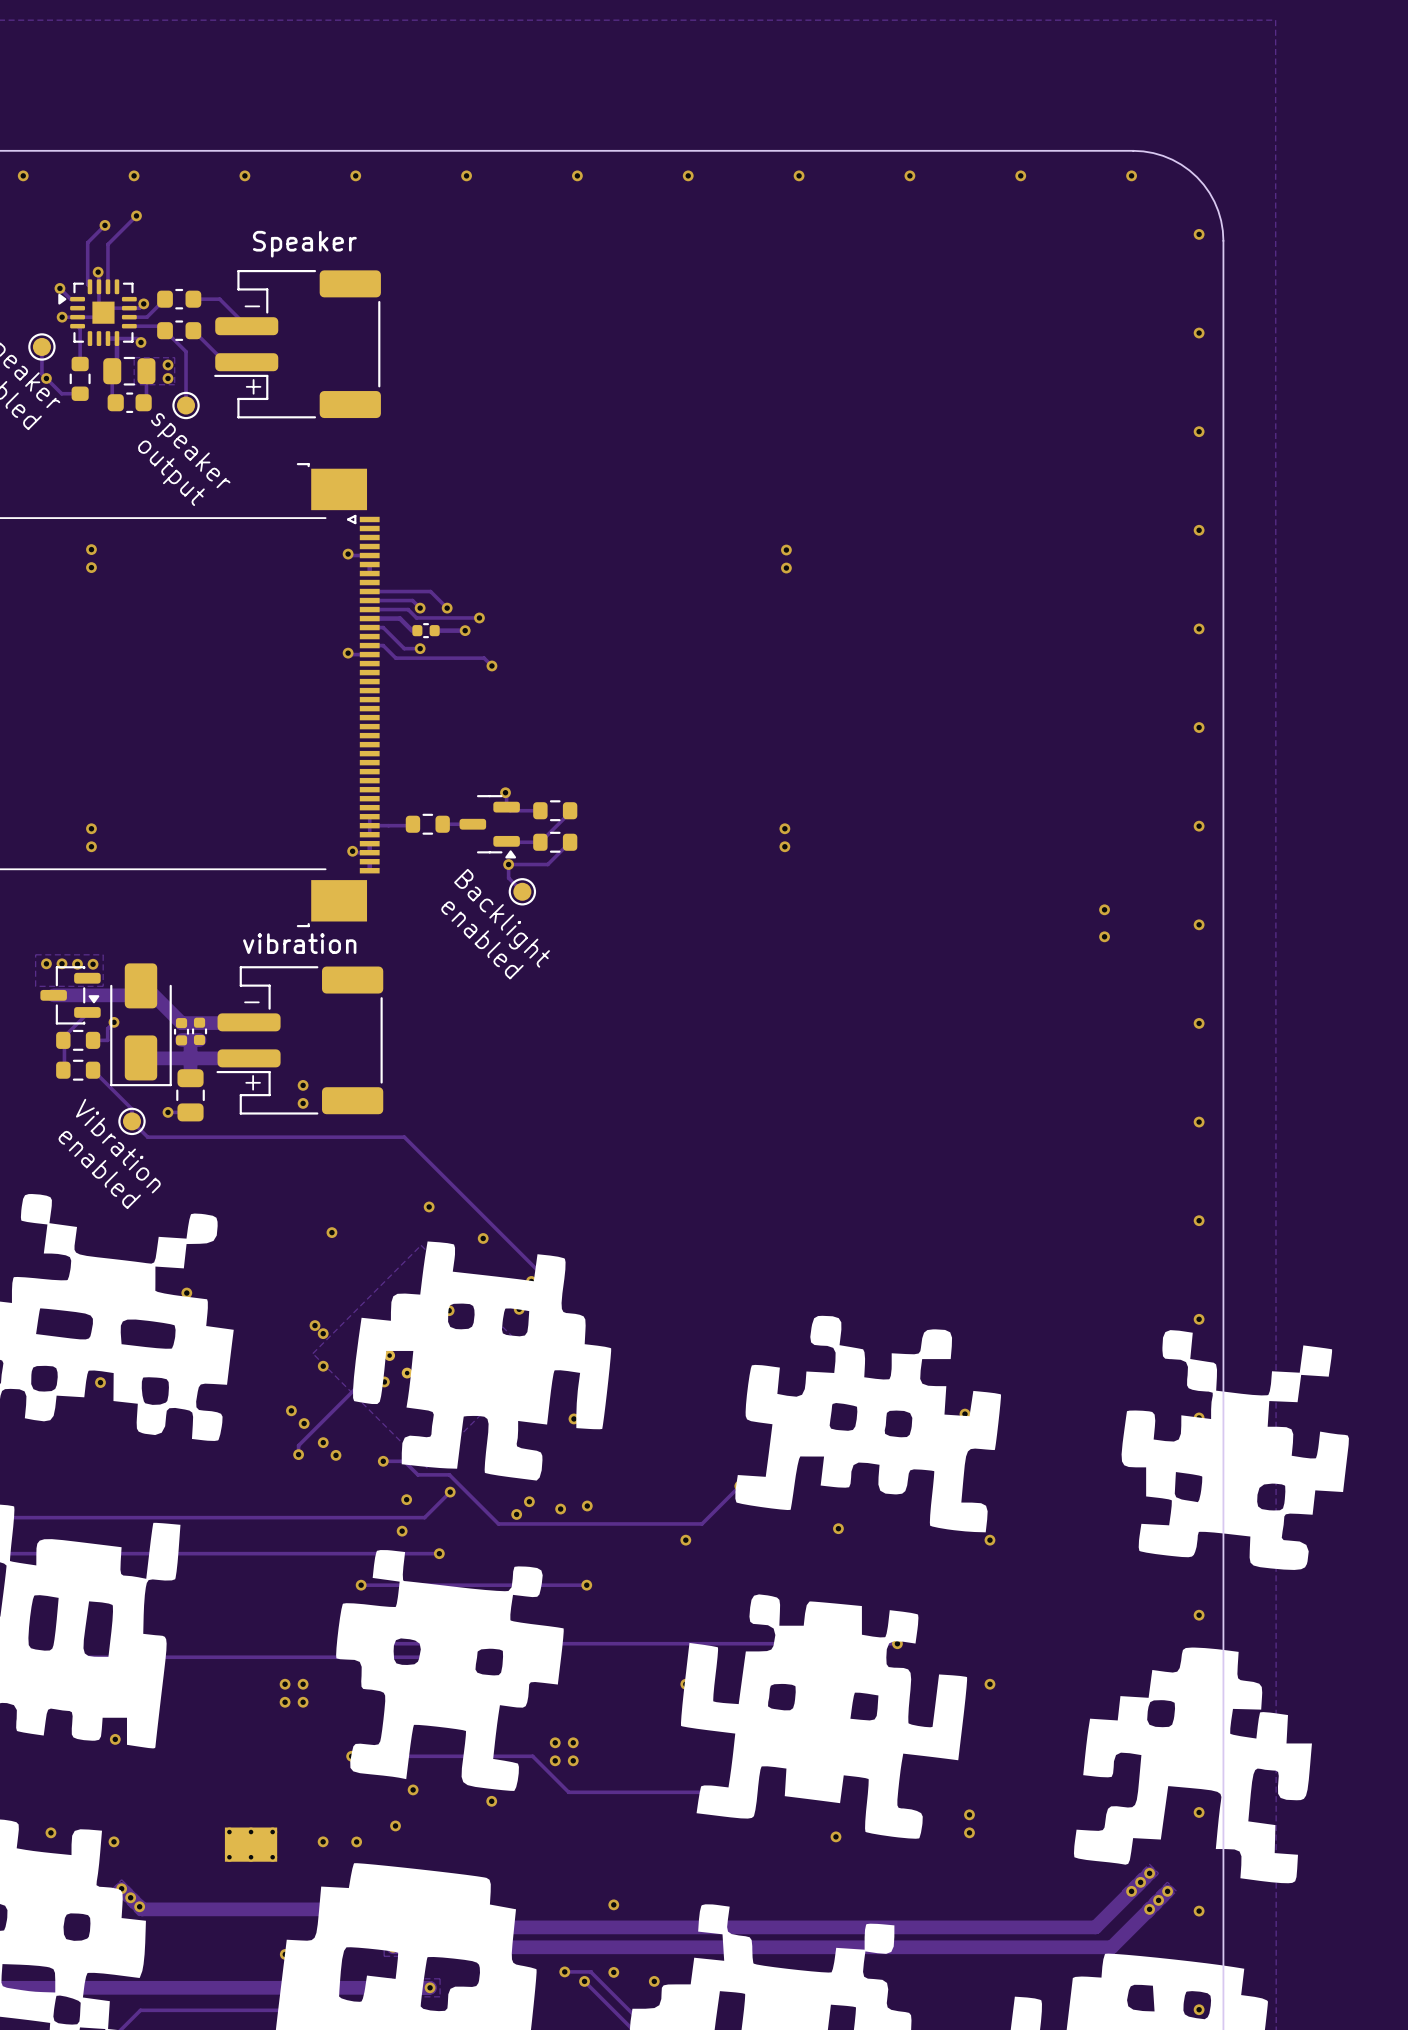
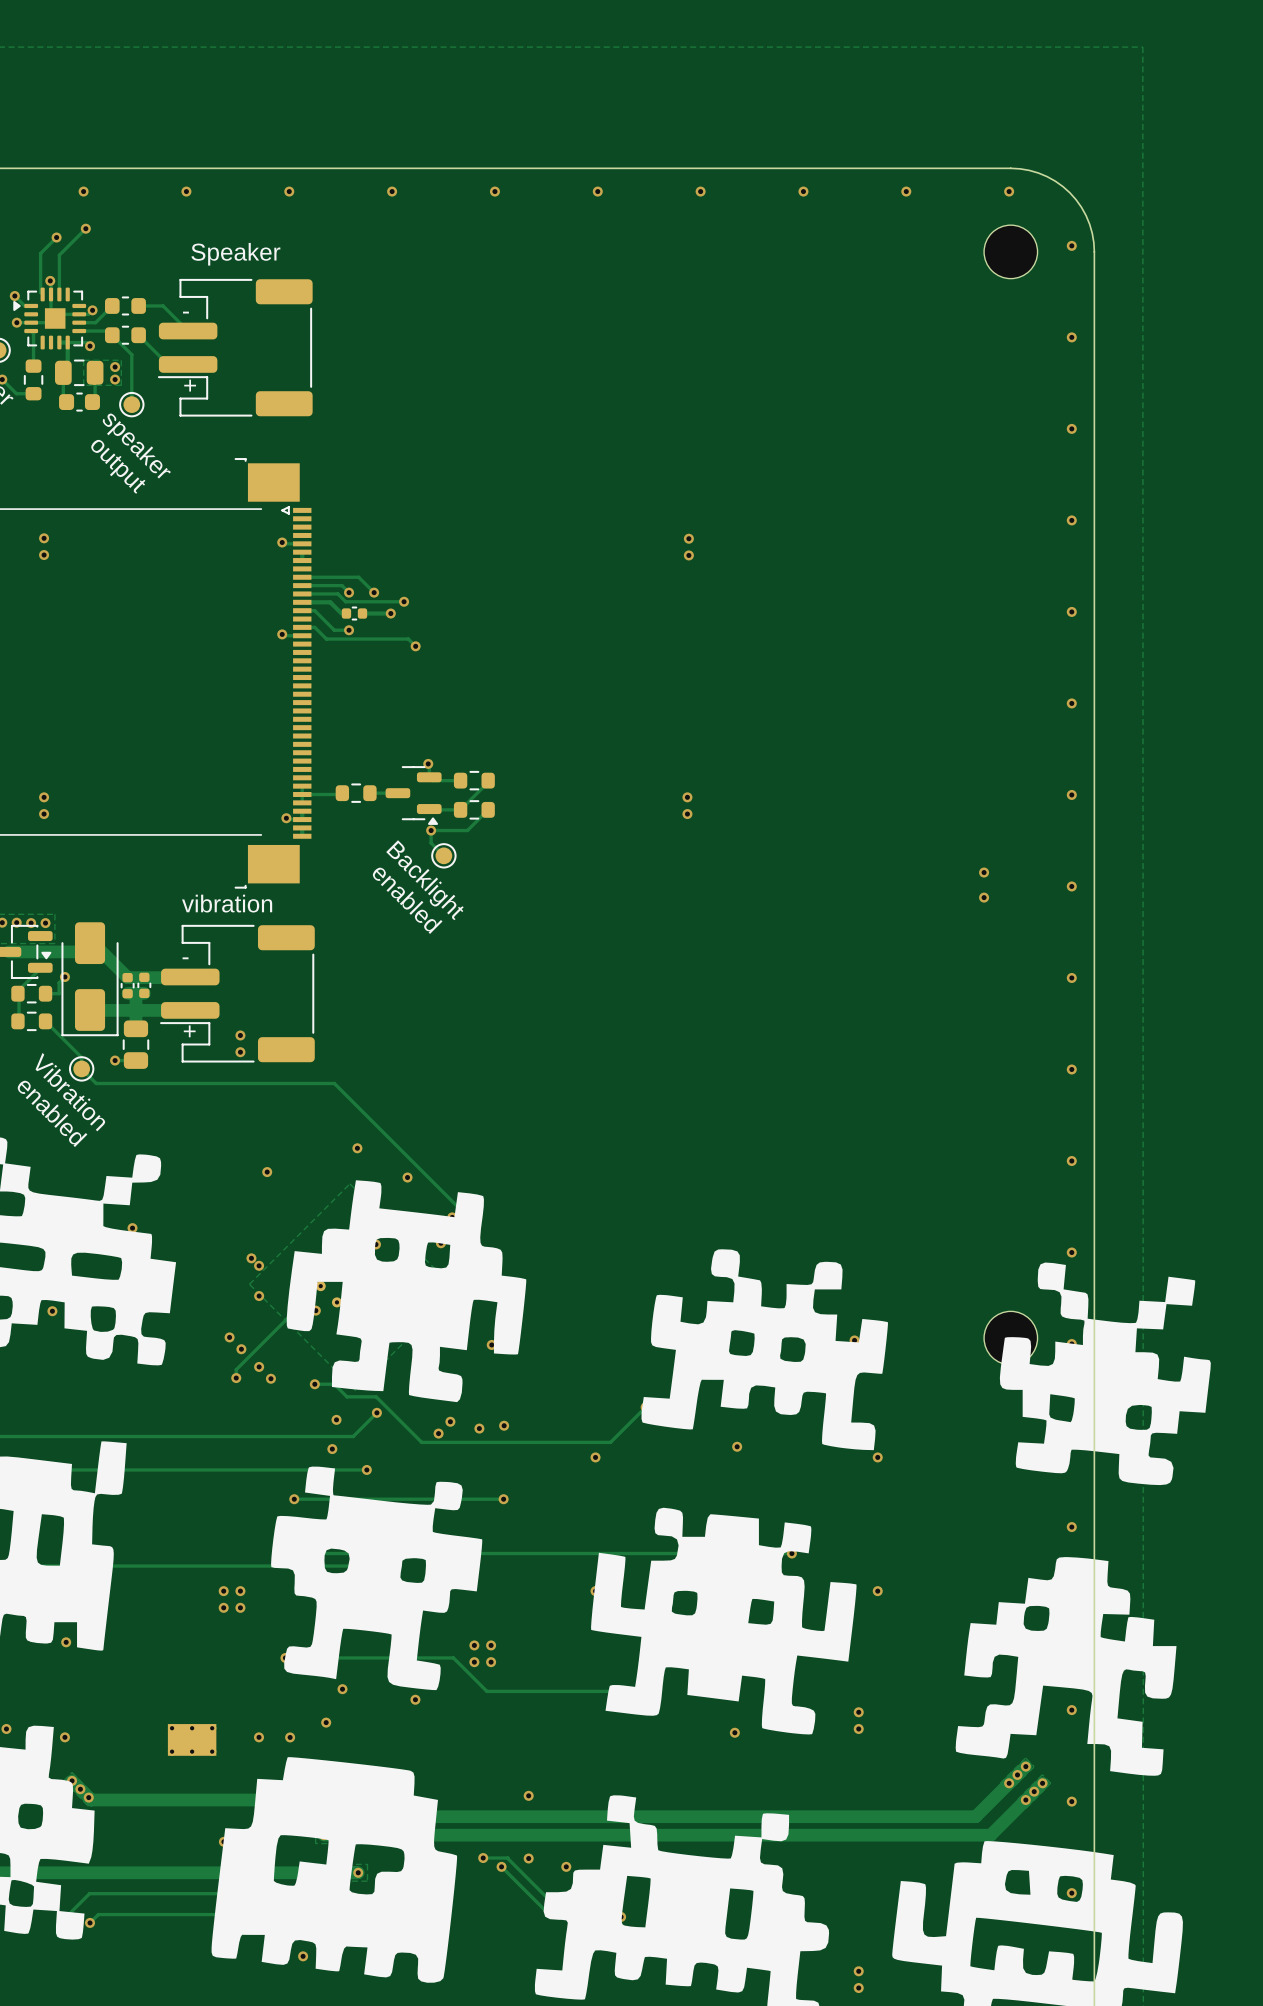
part: none -> (1010, 251)
part: none -> (1010, 1338)

